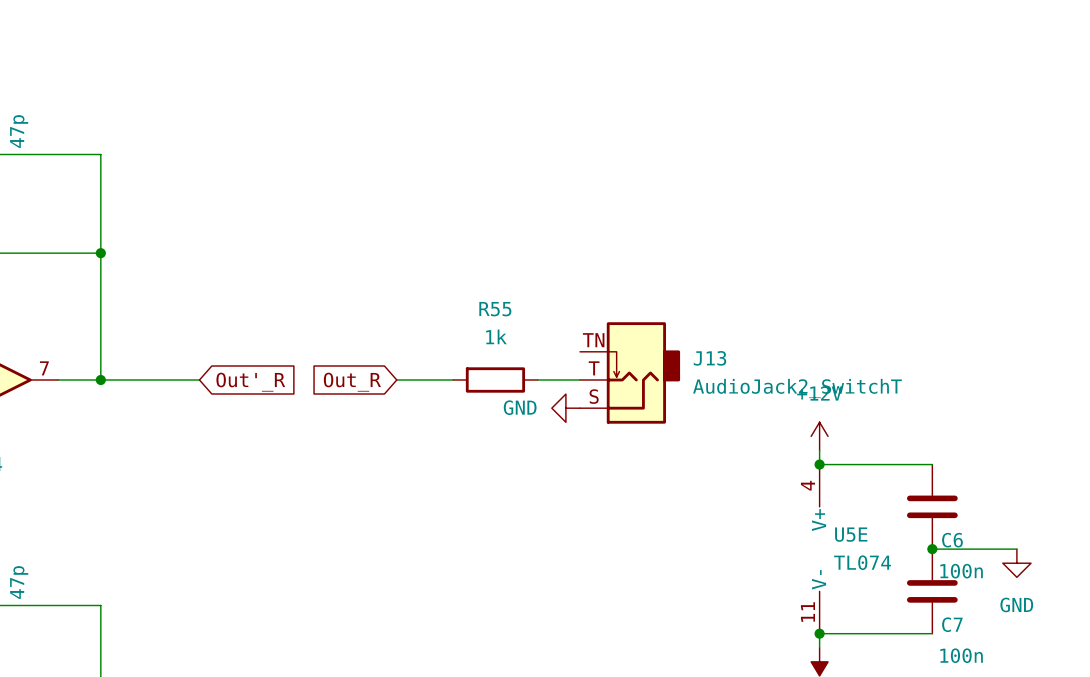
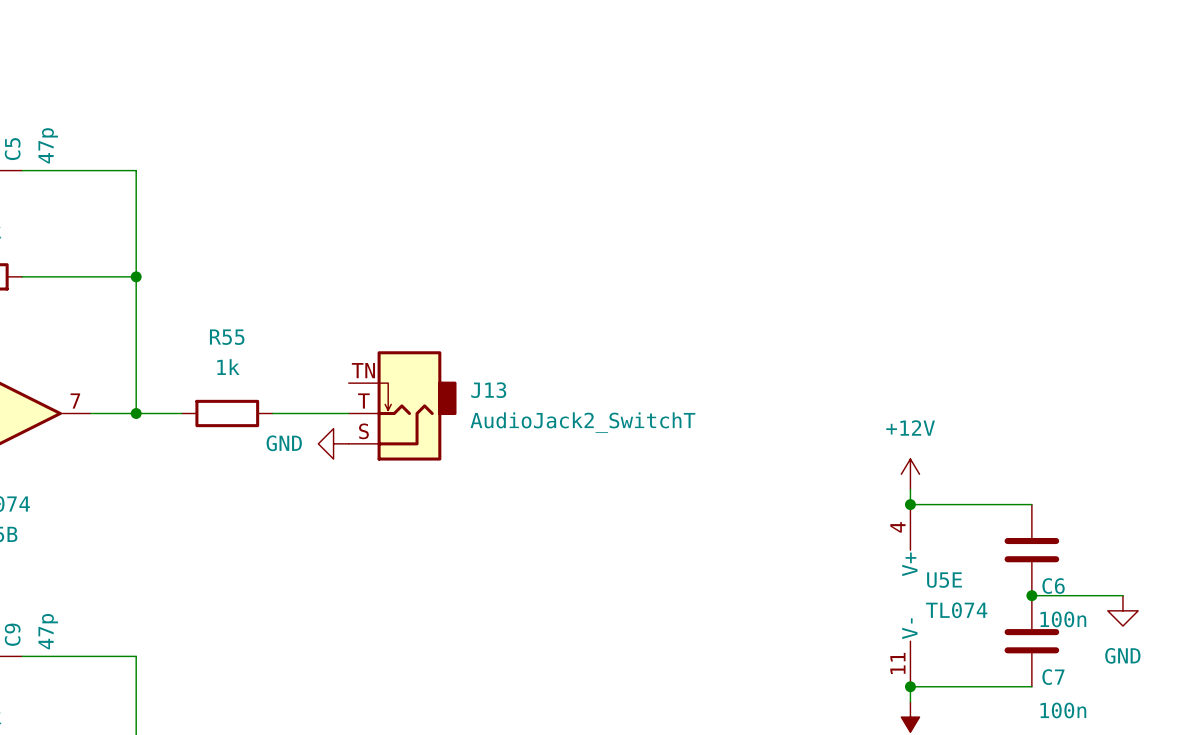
J13 position: (630, 372) -> (402, 405)
wire: (143, 380) (199, 380) -> none
wire: none -> (272, 413) (348, 413)
wire: (396, 380) (453, 380) -> none
R55 position: (495, 380) -> (227, 413)
wire: (537, 380) (580, 380) -> none
global label: Out'_R (250, 382) -> none
global label: Out_R (352, 382) -> none
power symbol: none -> GND (333, 443)
power symbol: GND (565, 408) -> none

